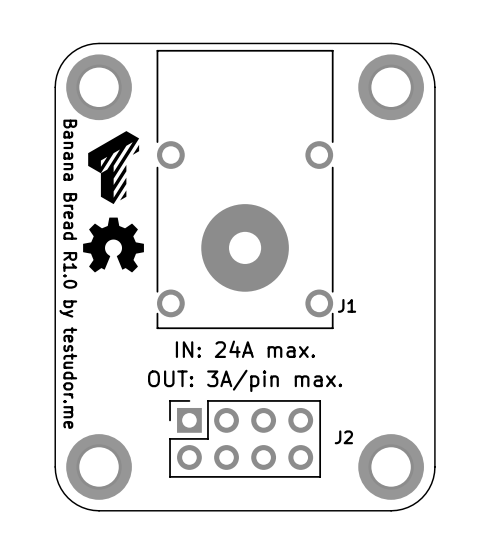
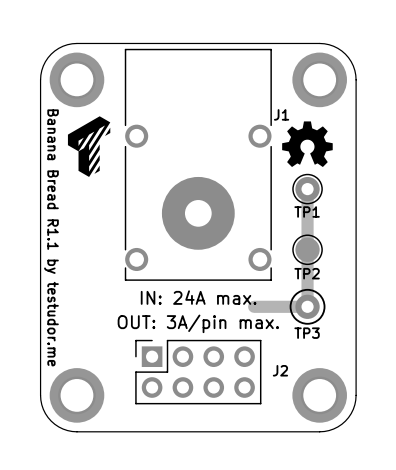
track: none -> (307, 189) (307, 306) (254, 306)
TP1: none -> (307, 189)
drawing position: (113, 244) -> (307, 144)
text: Banana Bread R1.0 by testudor.me (68, 274) -> Banana Bread R1.1 by testudor.me (51, 237)
TP2: none -> (307, 249)
J1 name position: J1 (347, 305) -> J1 (281, 114)
TP3: none -> (307, 306)

